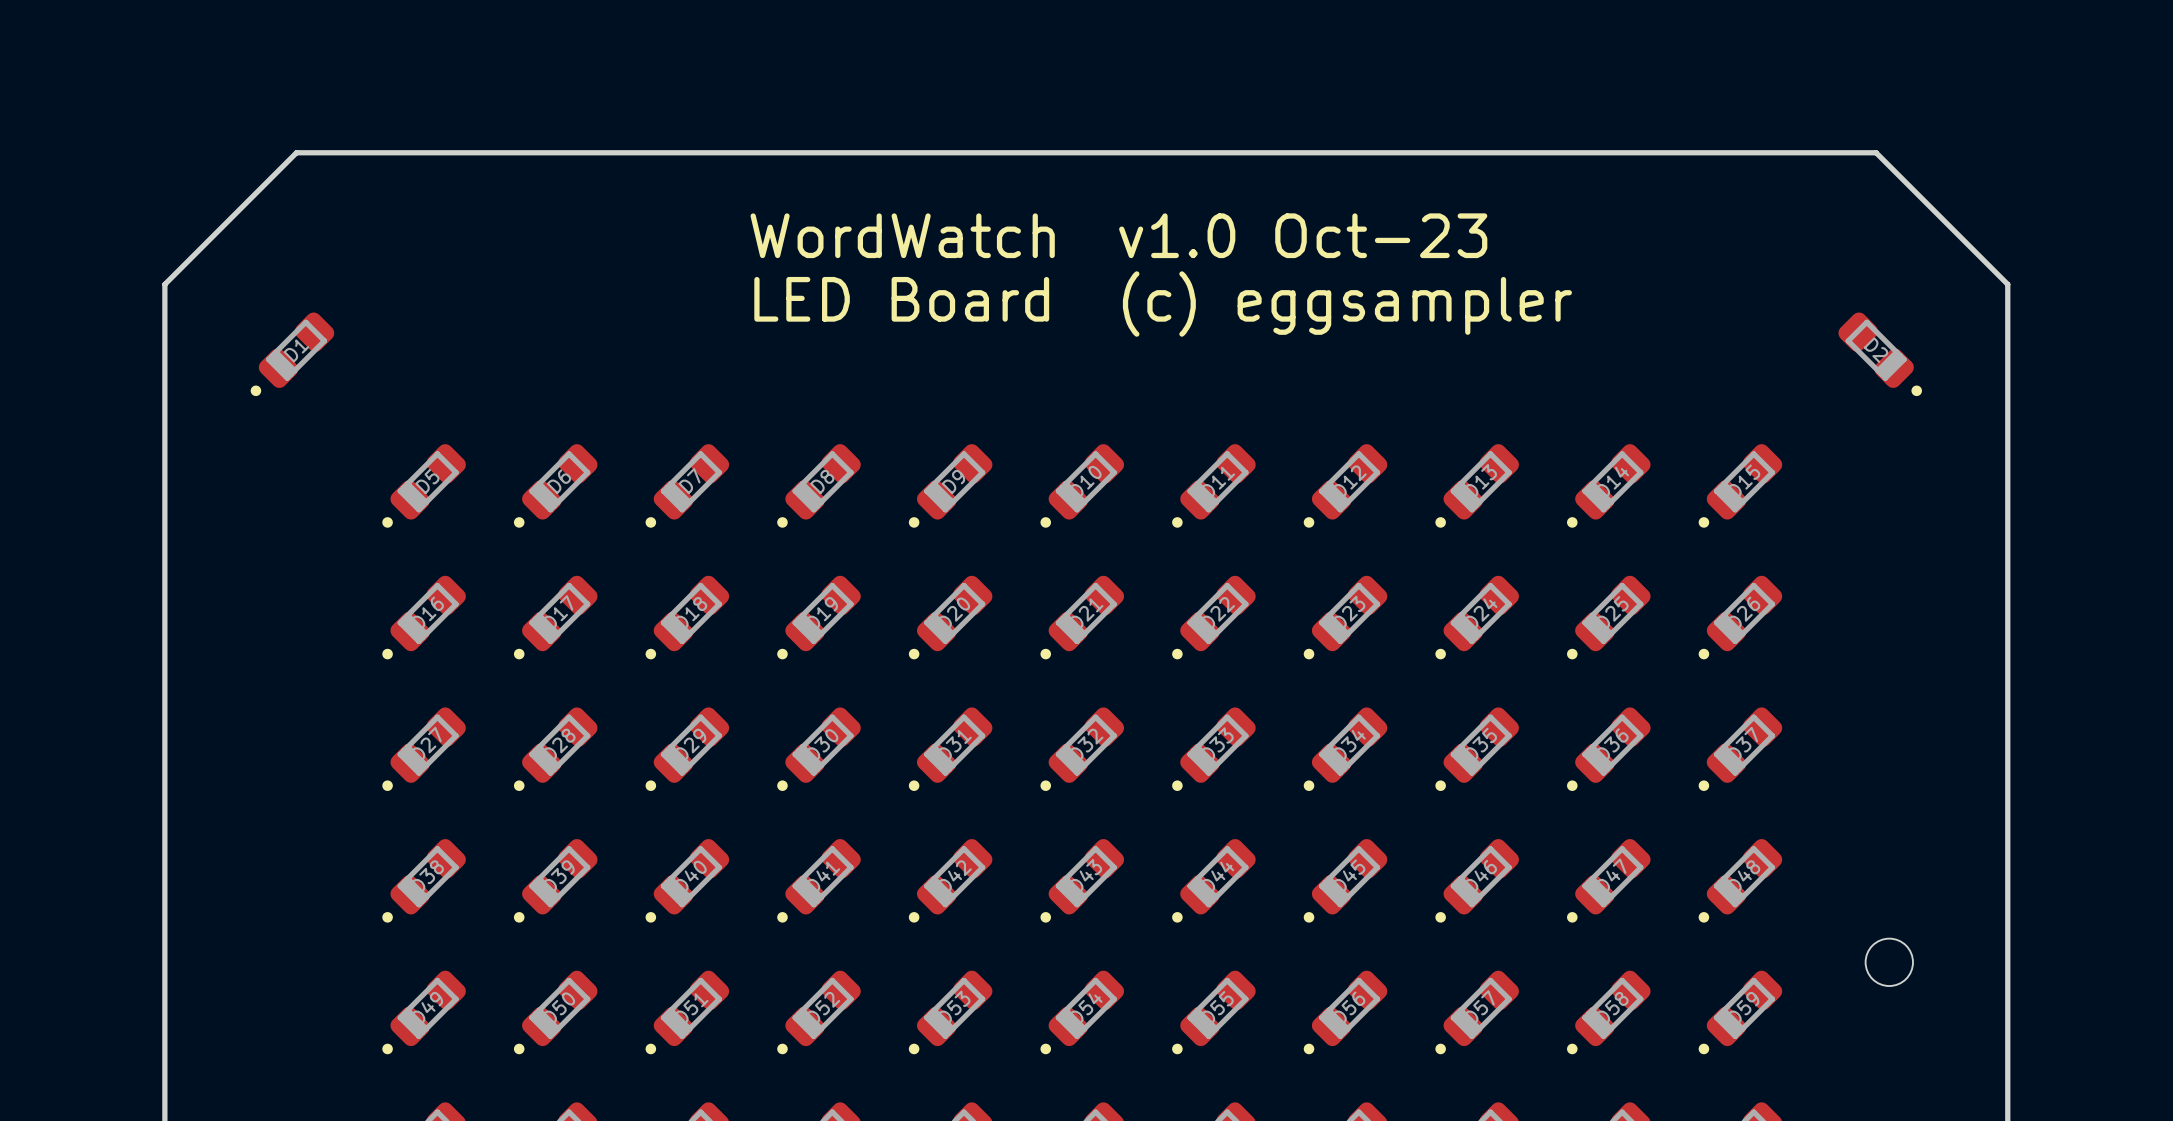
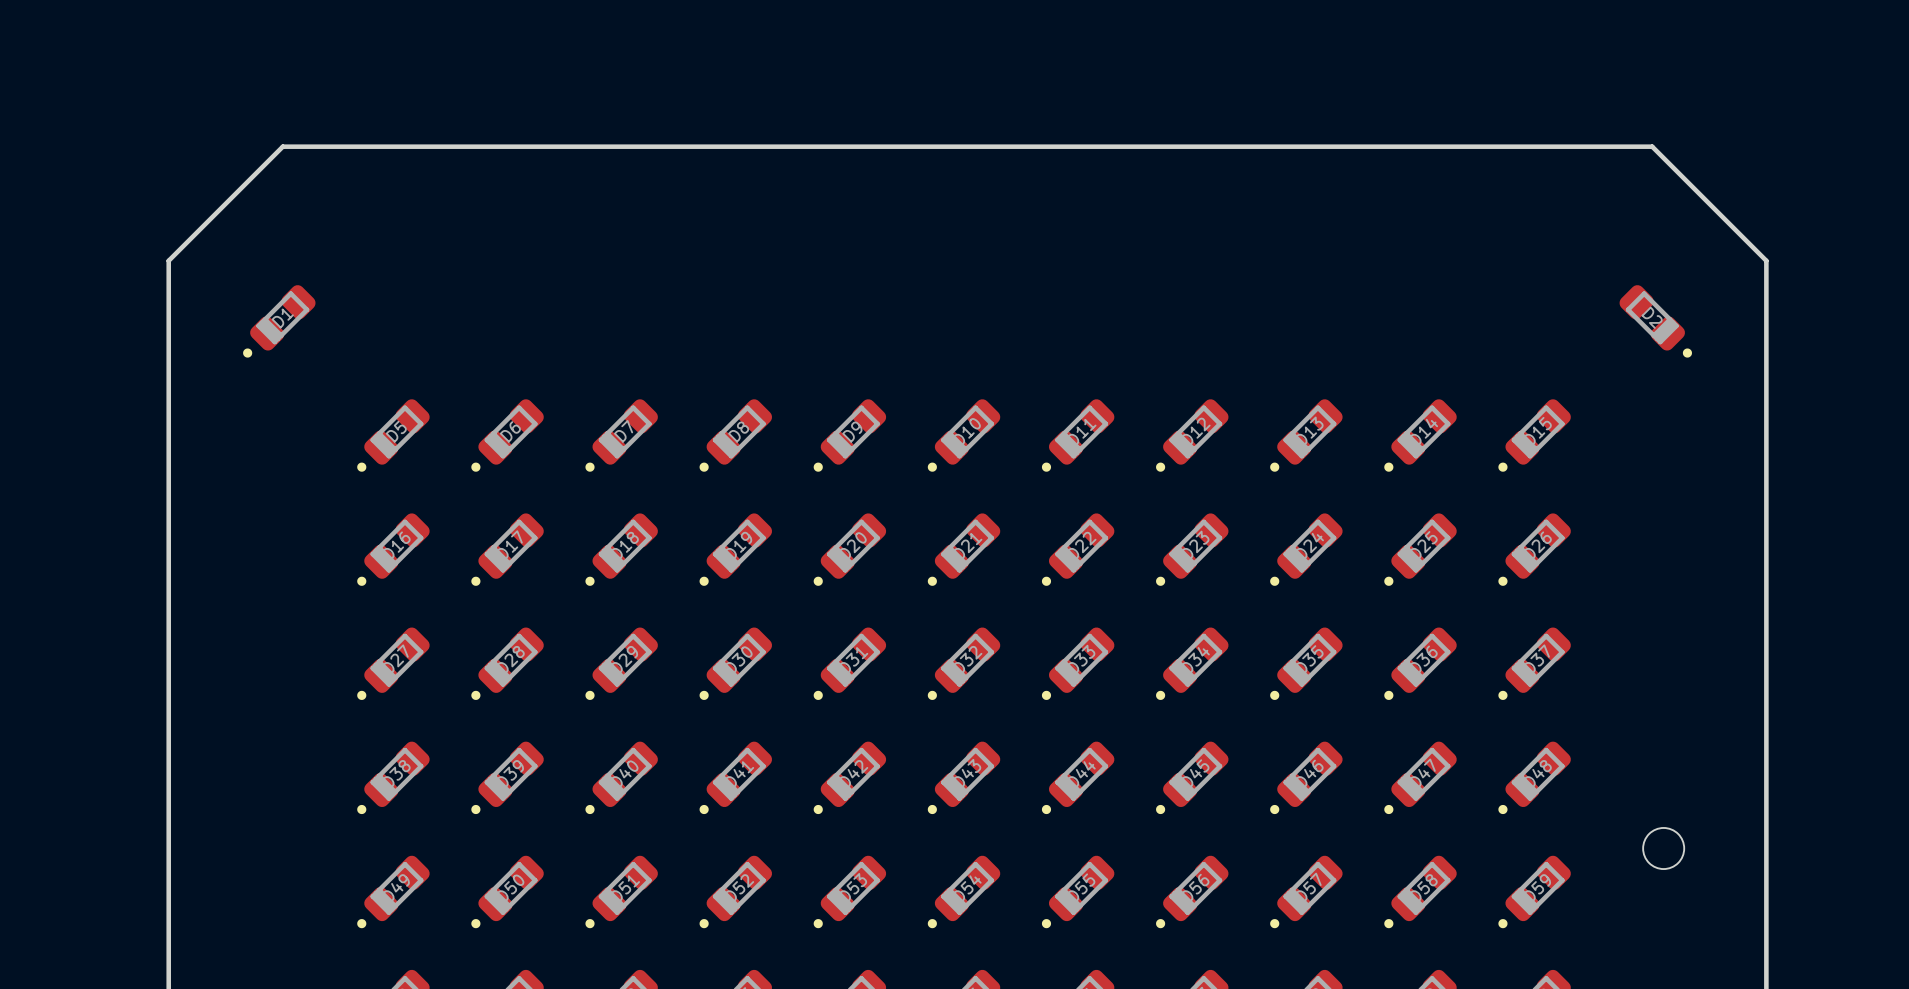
text: WordWatch (902, 235) -> none
text: v1.0 Oct-23 (1303, 235) -> none
text: LED Board (901, 299) -> none
text: (c) eggsampler (1347, 304) -> none

